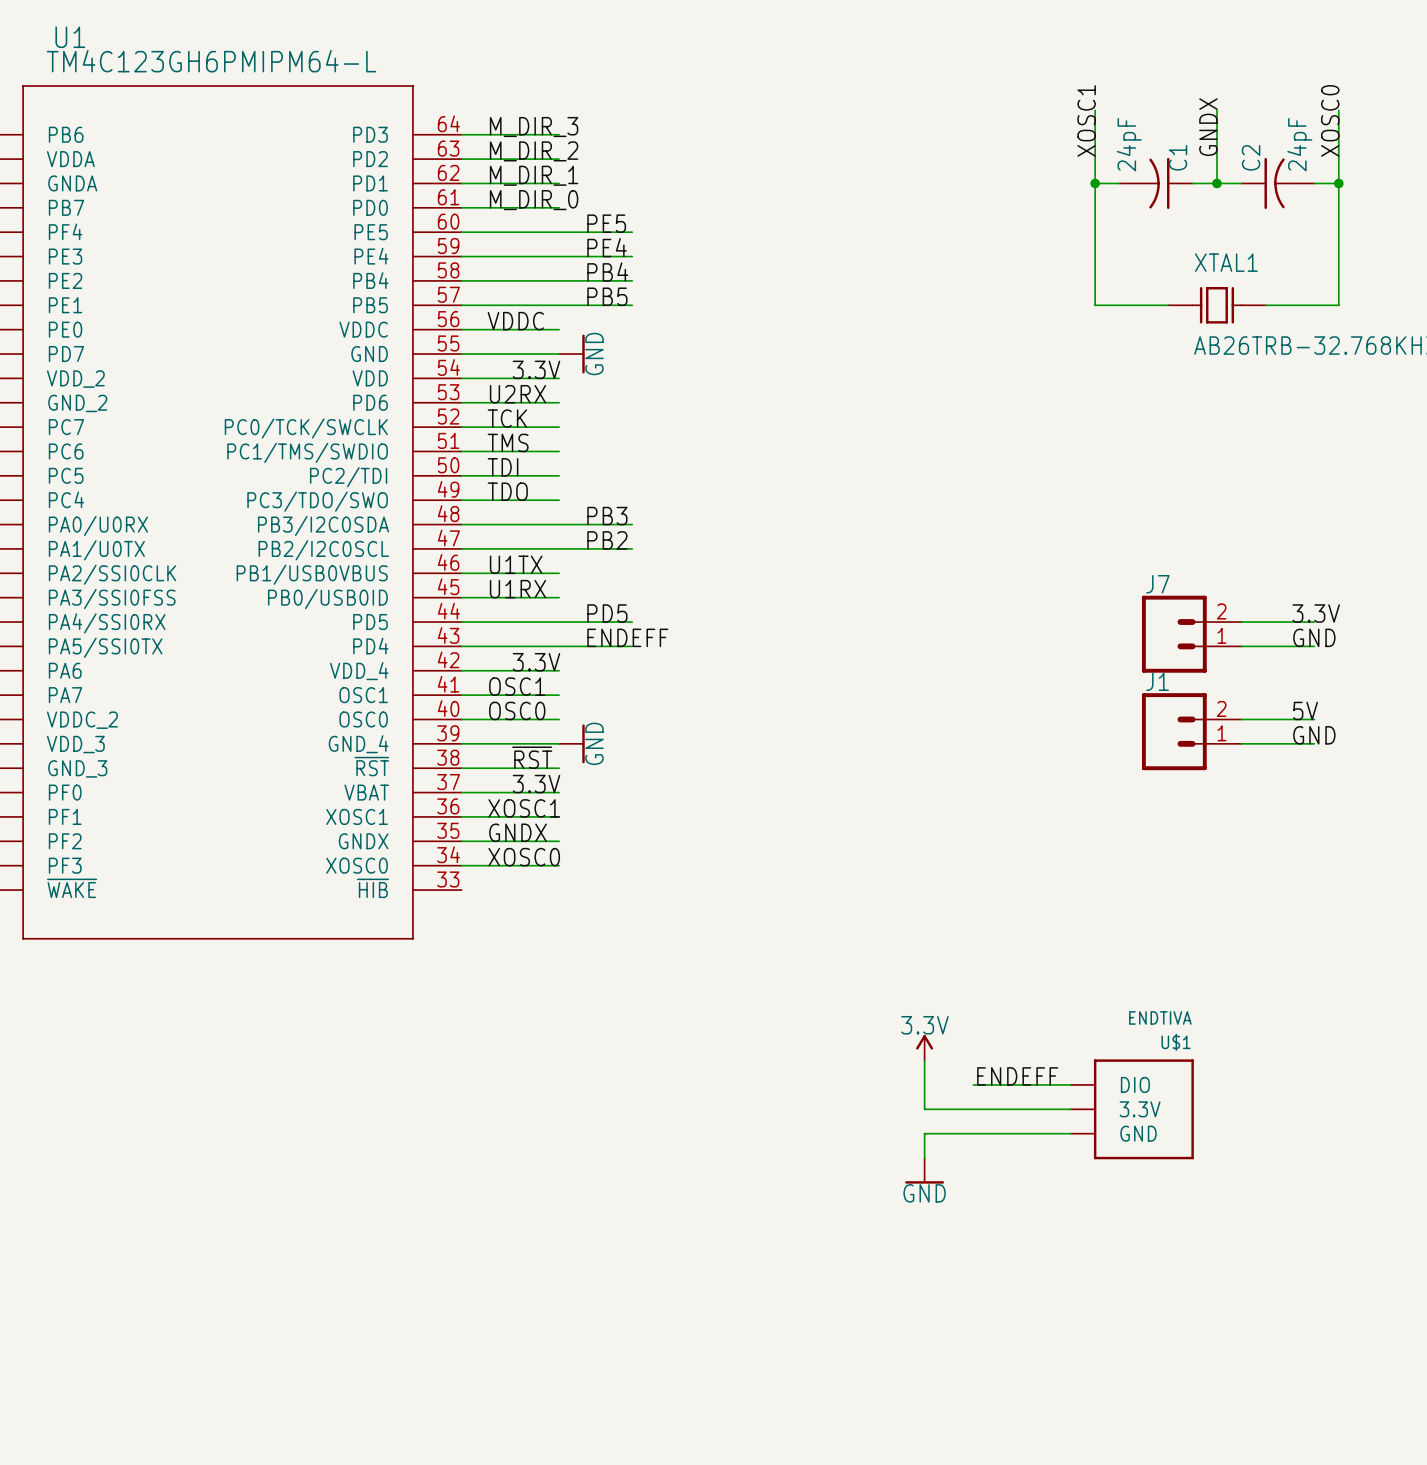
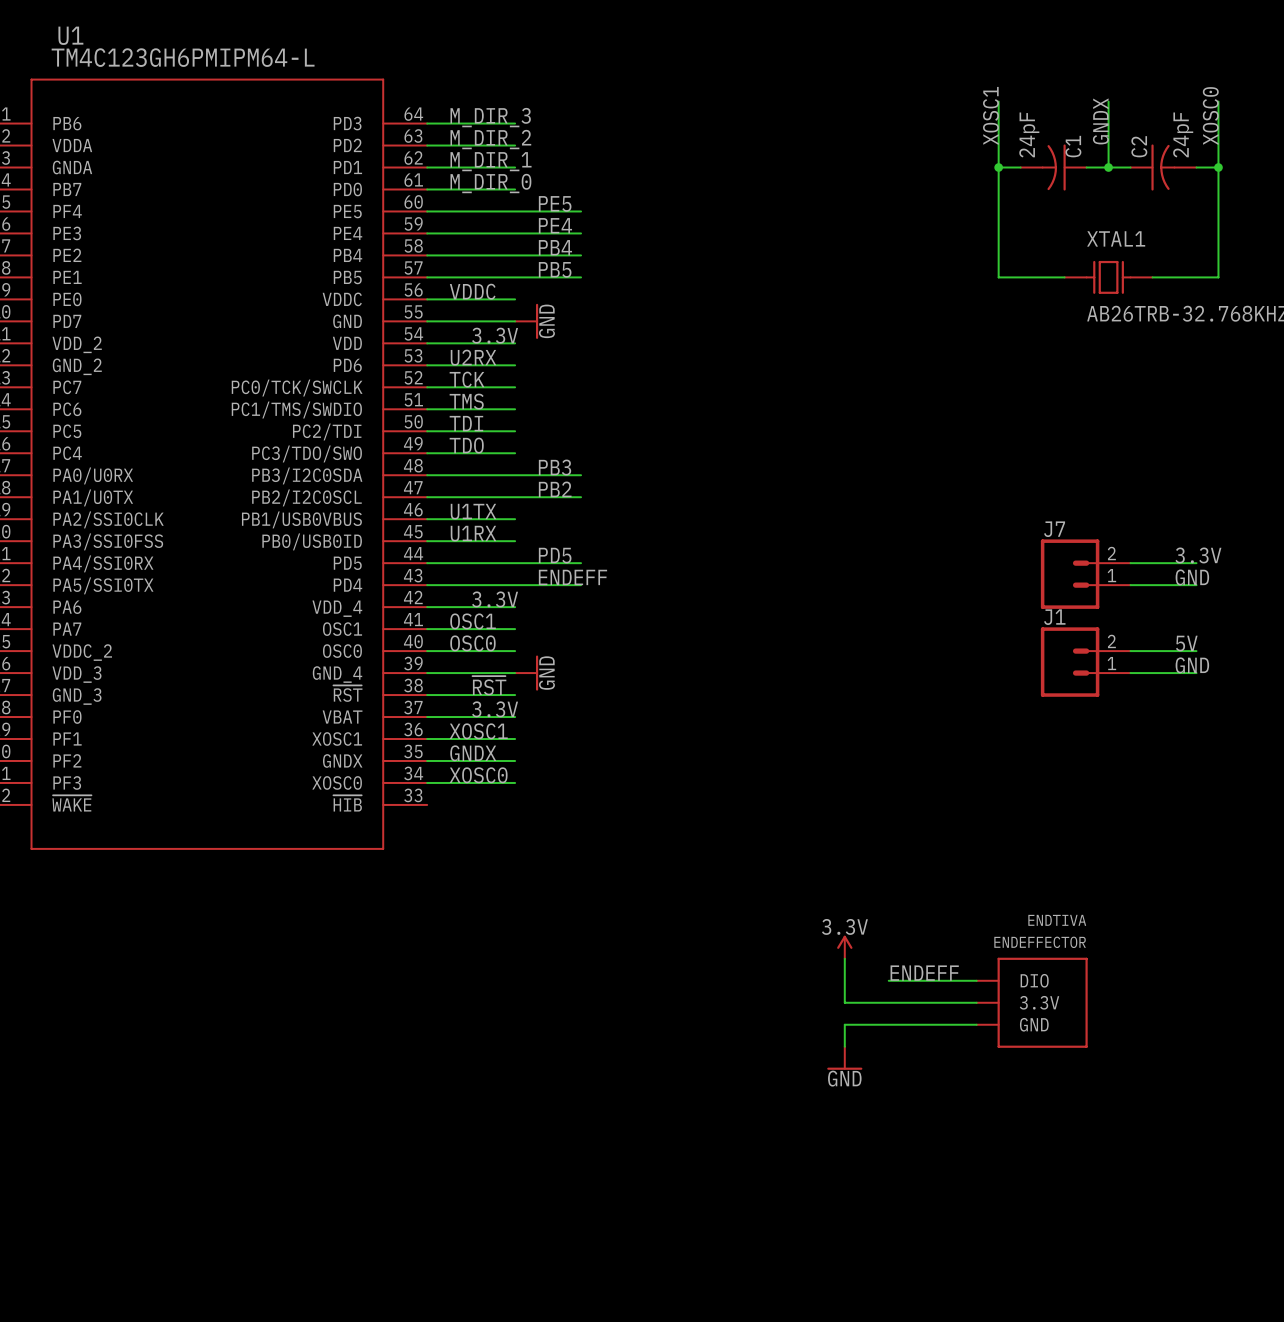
U$1 name: U$1 (1176, 1042) -> ENDEFFECTOR (1040, 942)

